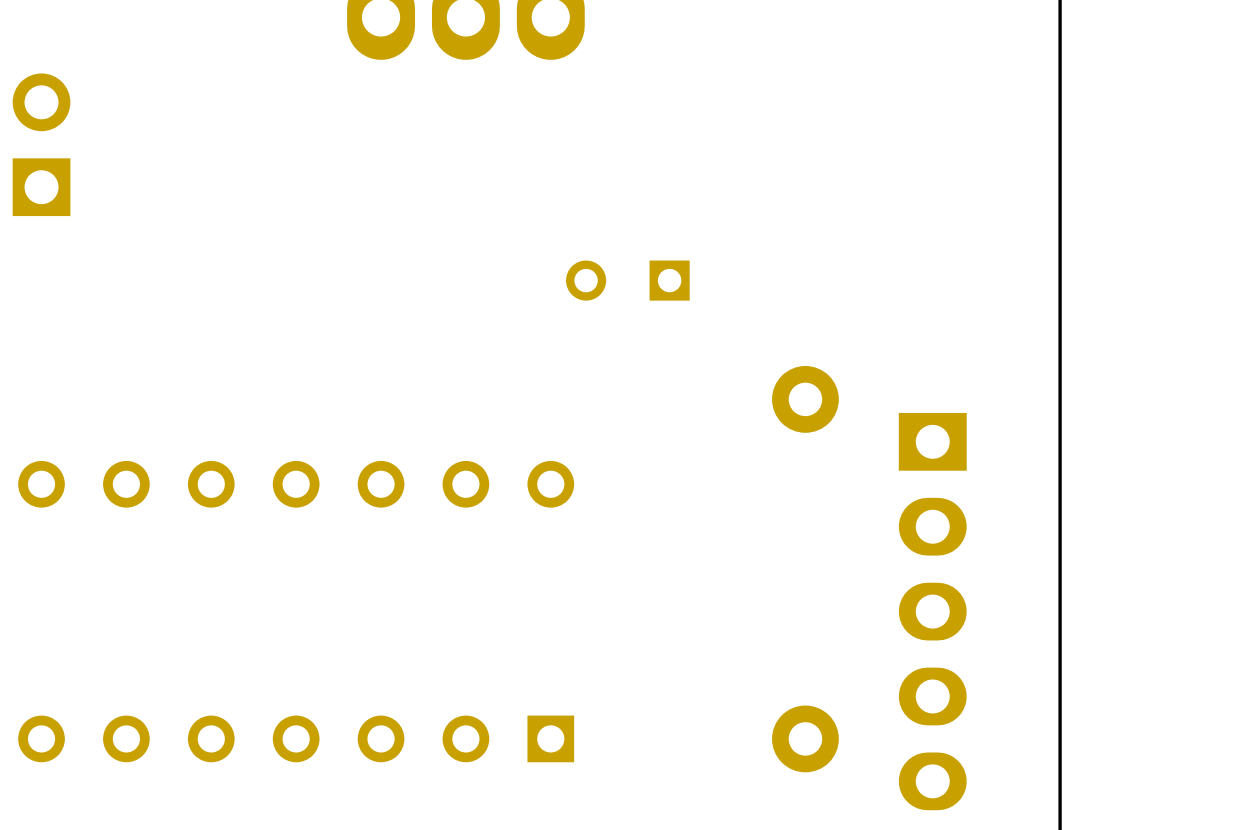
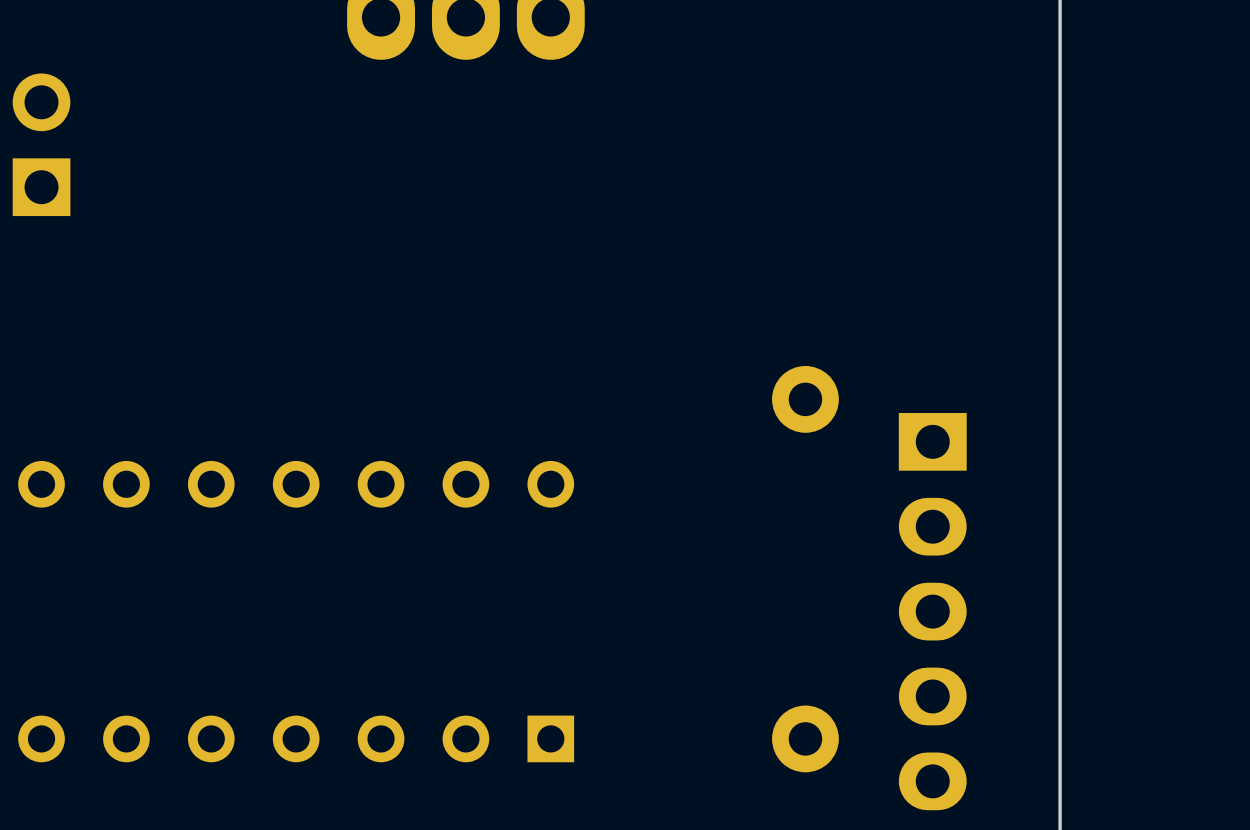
part: (627, 280) -> none

